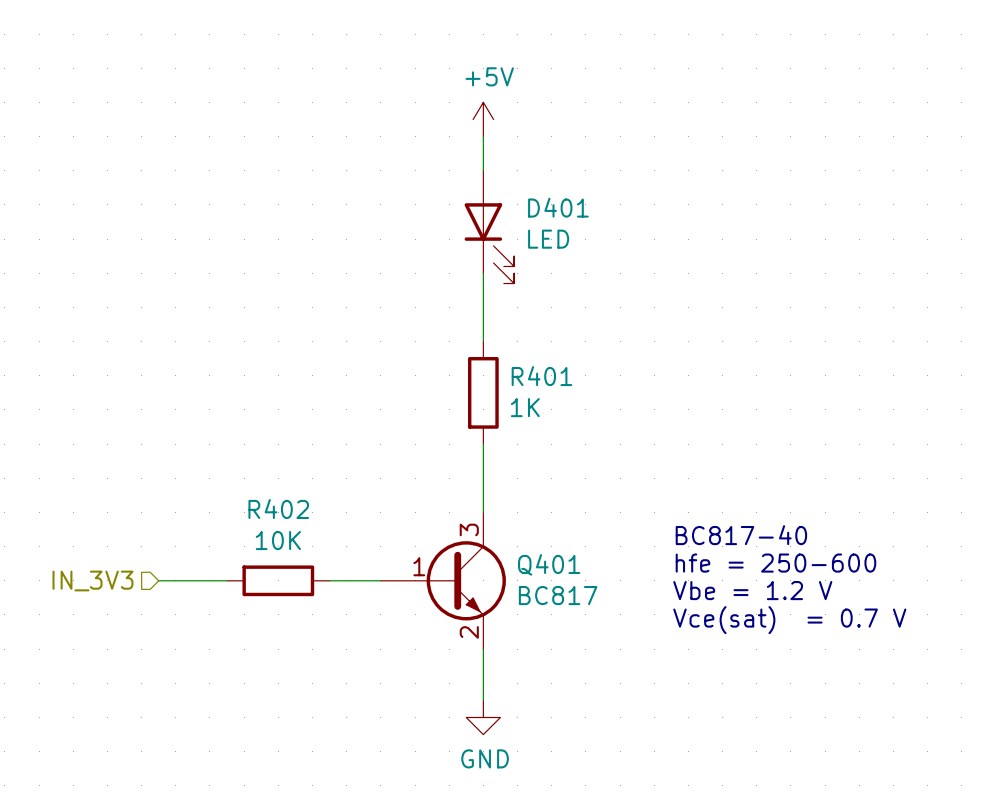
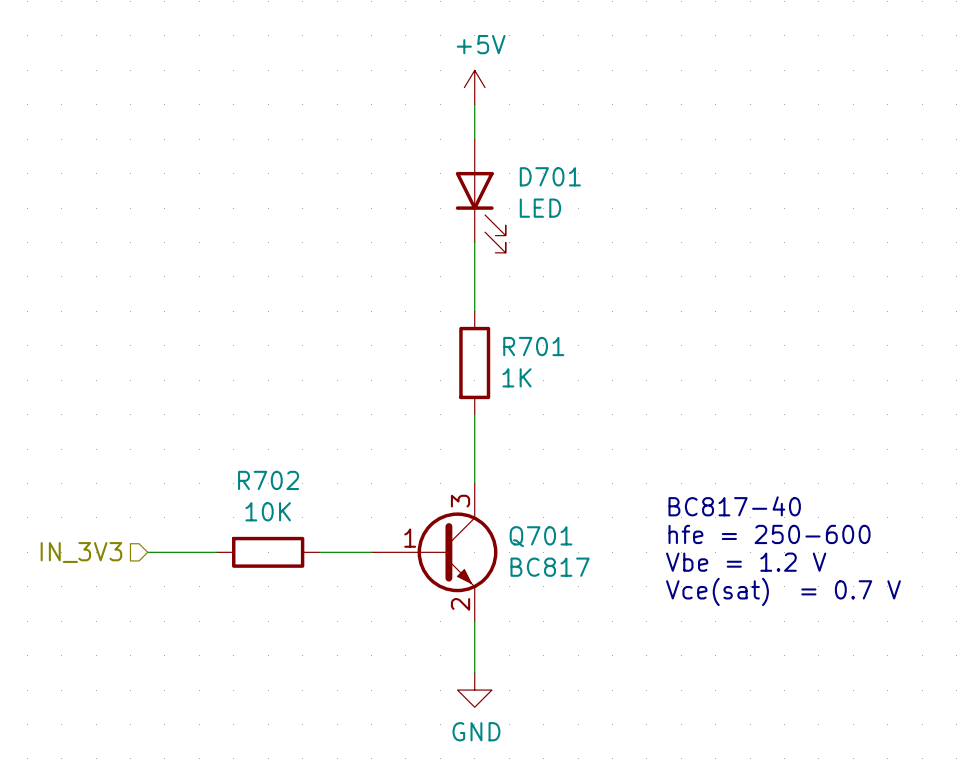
D401 name: D401 (558, 207) -> D701 (550, 176)
R401 name: R401 (541, 376) -> R701 (533, 346)
R402 name: R402 (278, 509) -> R702 (268, 480)
Q401 name: Q401 (549, 564) -> Q701 (541, 536)

